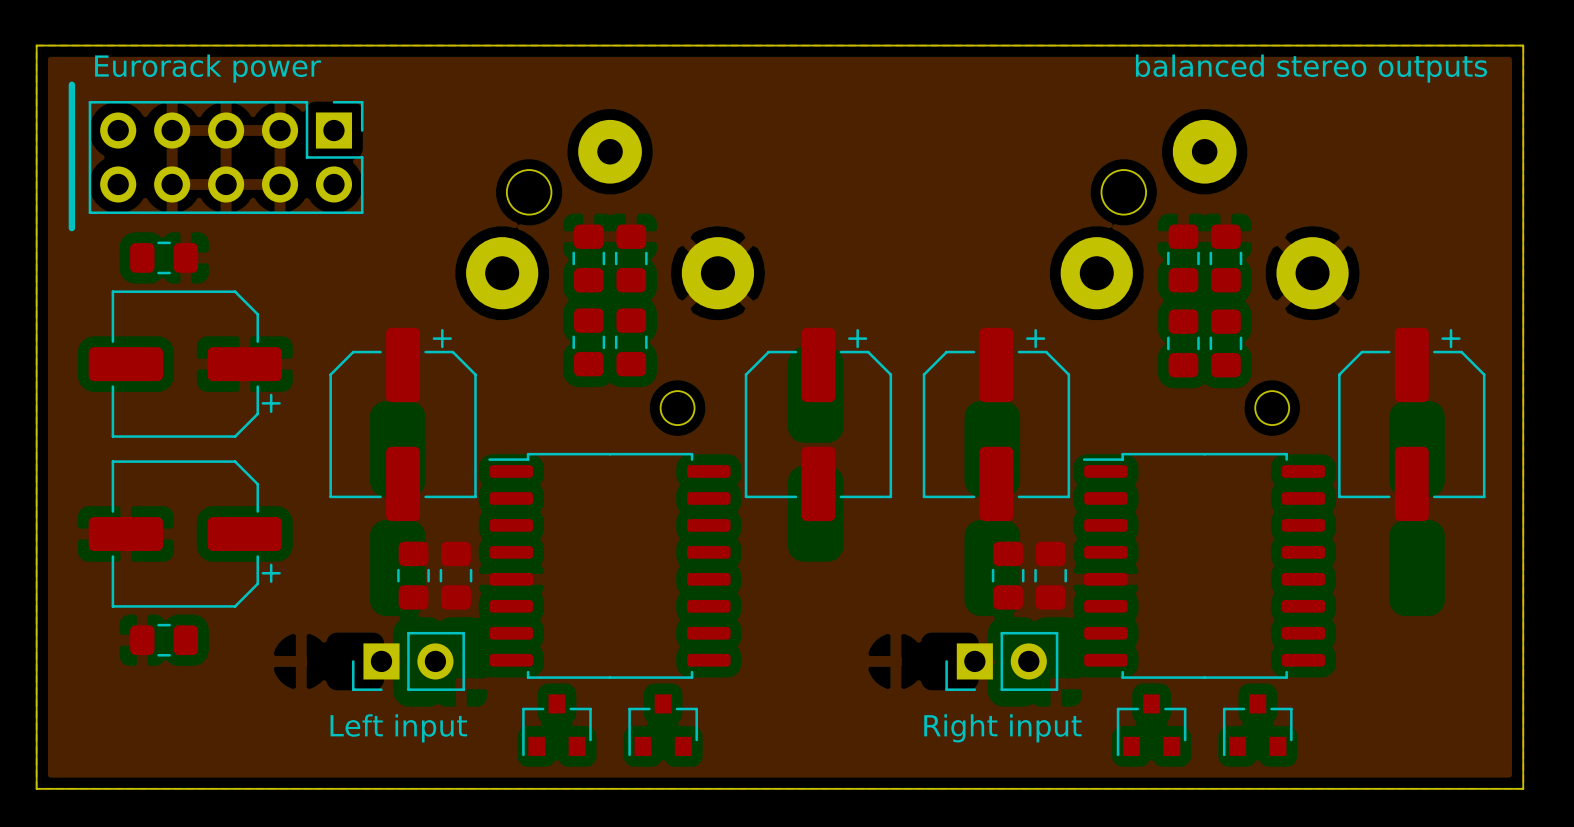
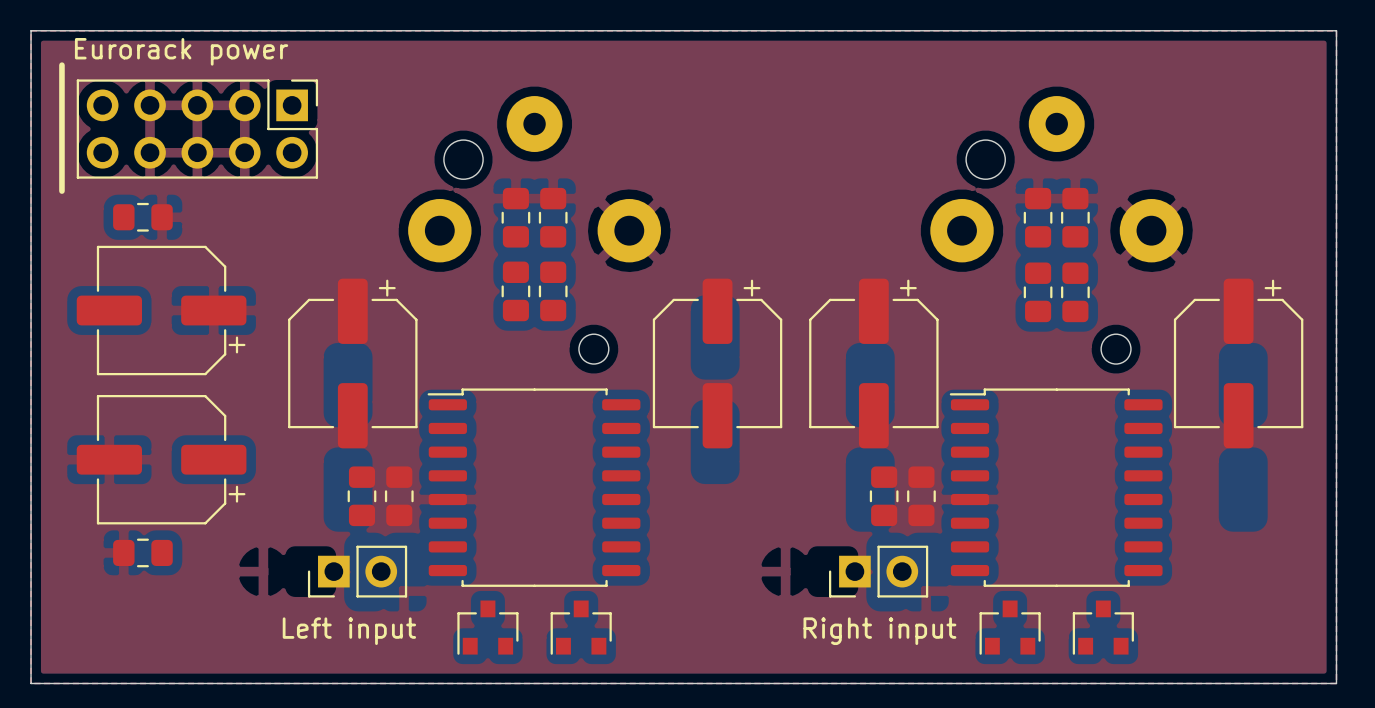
text: balanced stereo outputs (1311, 68) -> none

